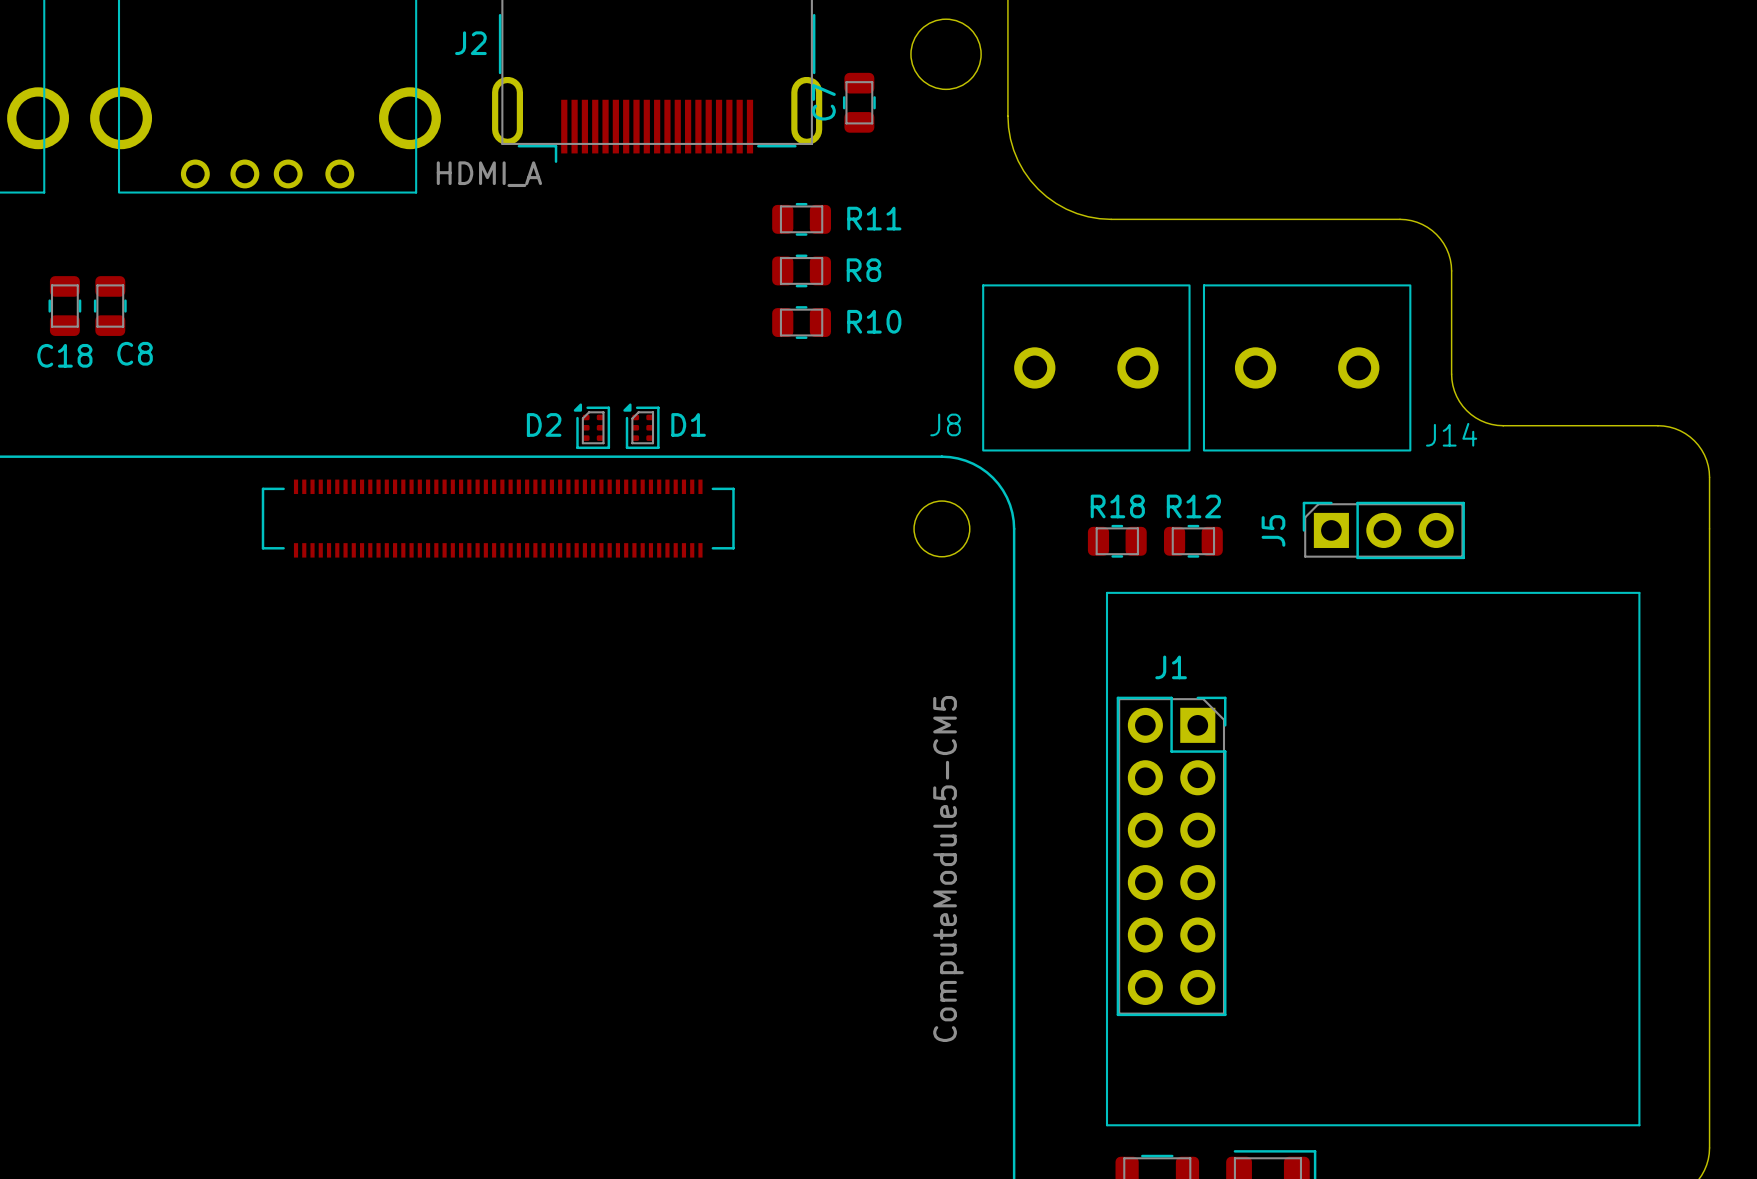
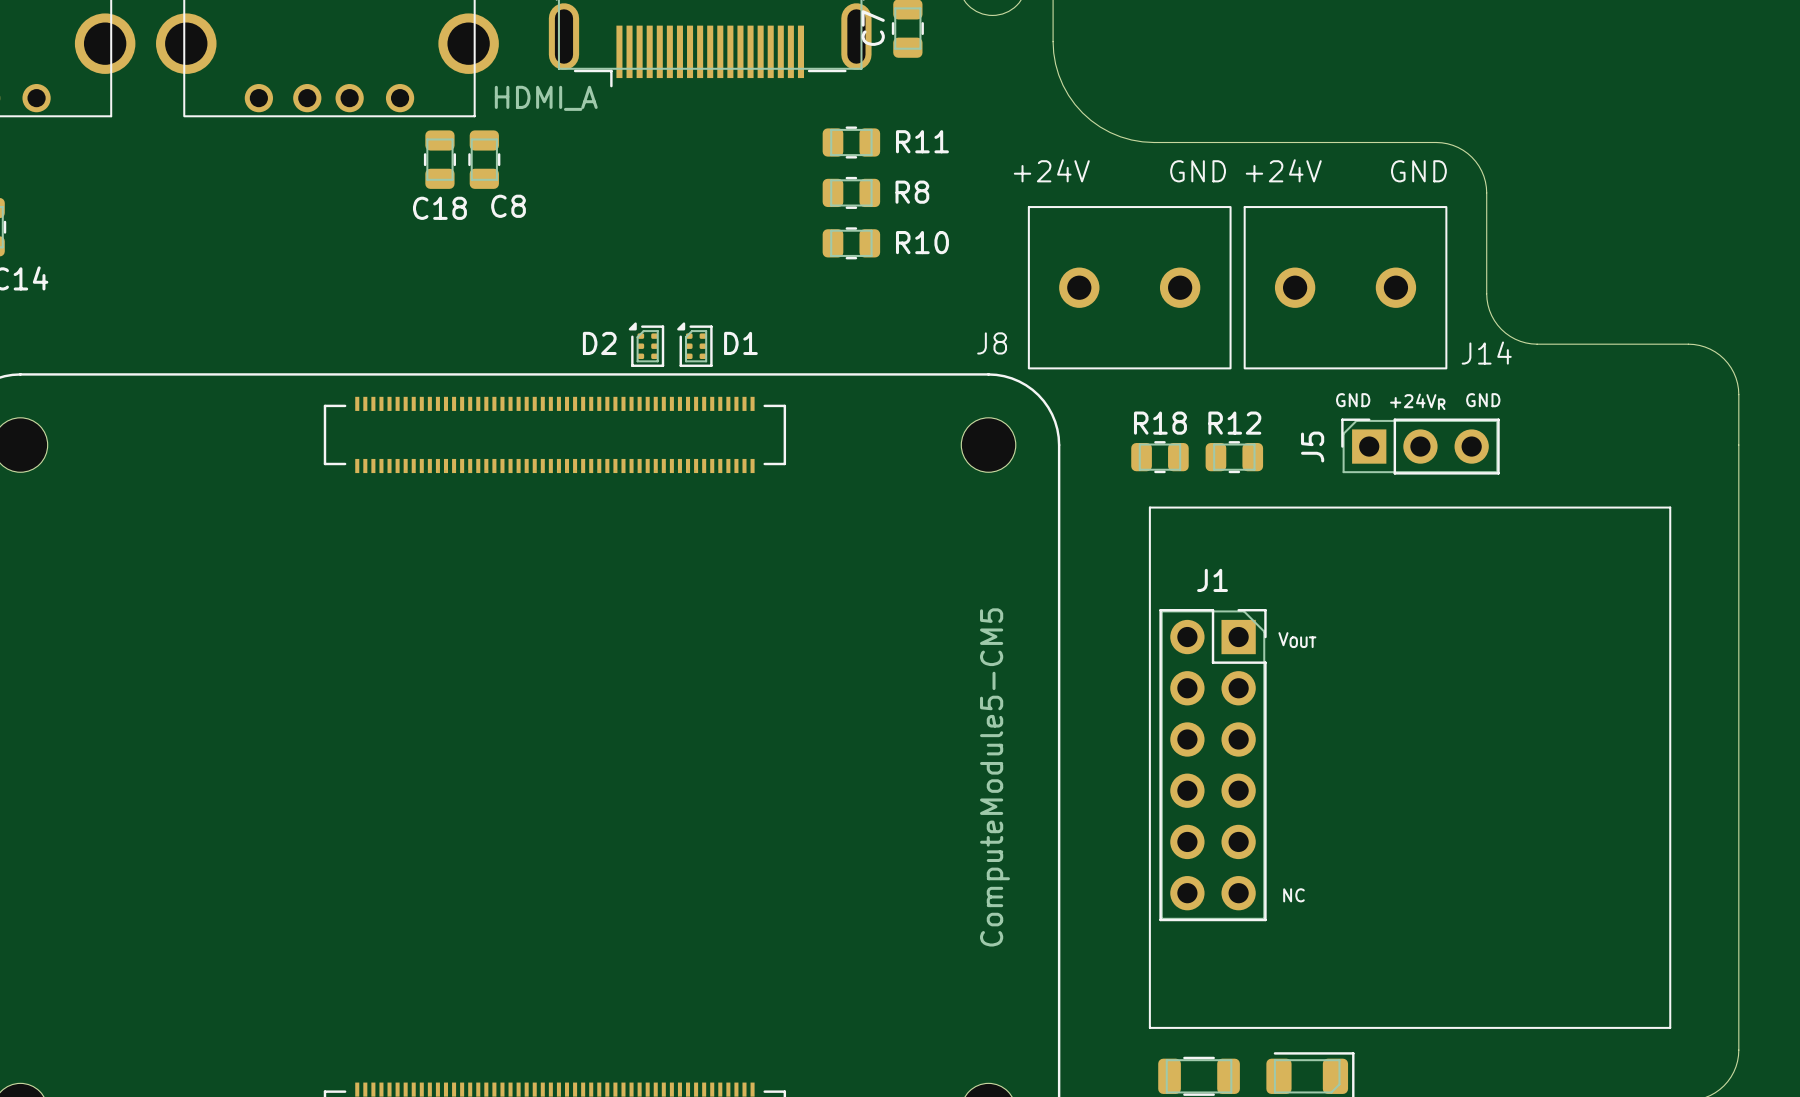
text: none -> +24V (1051, 170)
text: none -> GND (1198, 171)
text: none -> +24V (1283, 170)
text: none -> GND (1418, 171)
C18 position: (64, 306) -> (439, 159)
C8 position: (110, 306) -> (484, 159)
text: none -> GND (1353, 400)
text: none -> GND (1483, 400)
text: none -> +24VR (1417, 401)
text: none -> VOUT (1297, 640)
text: none -> NC (1293, 895)

